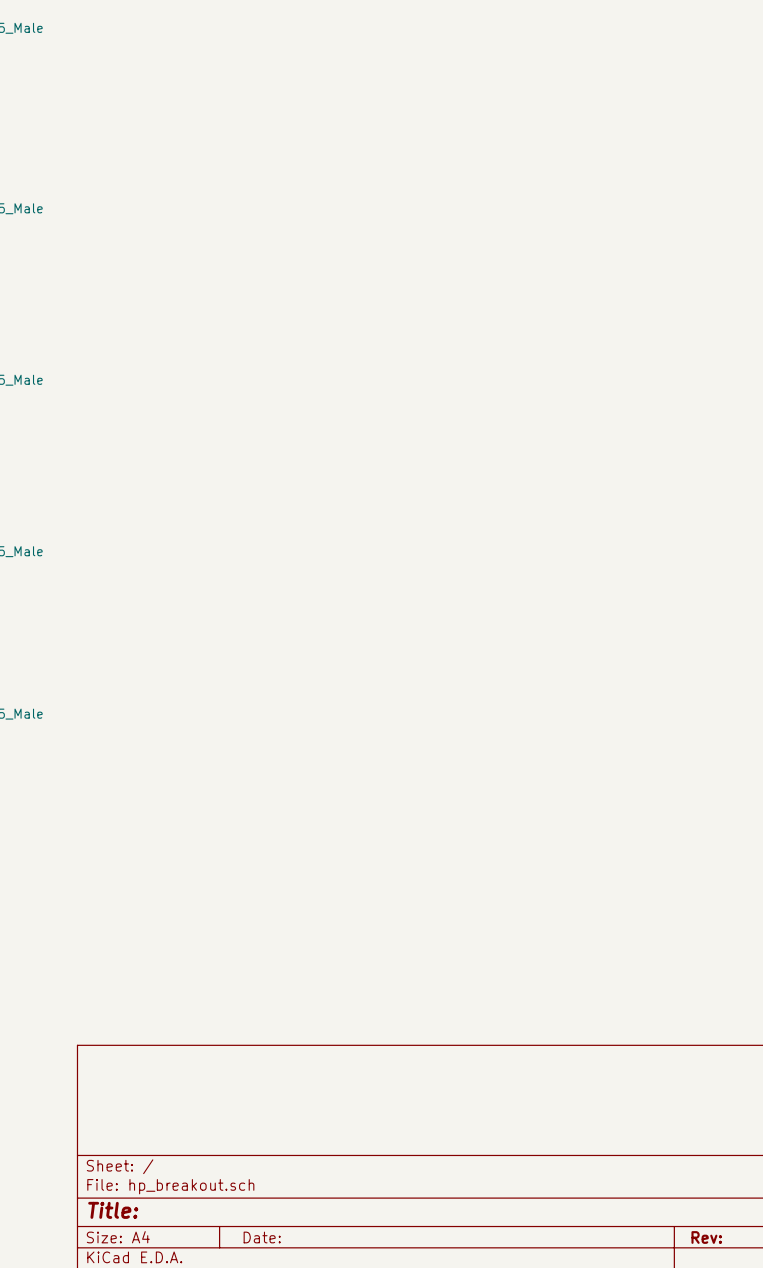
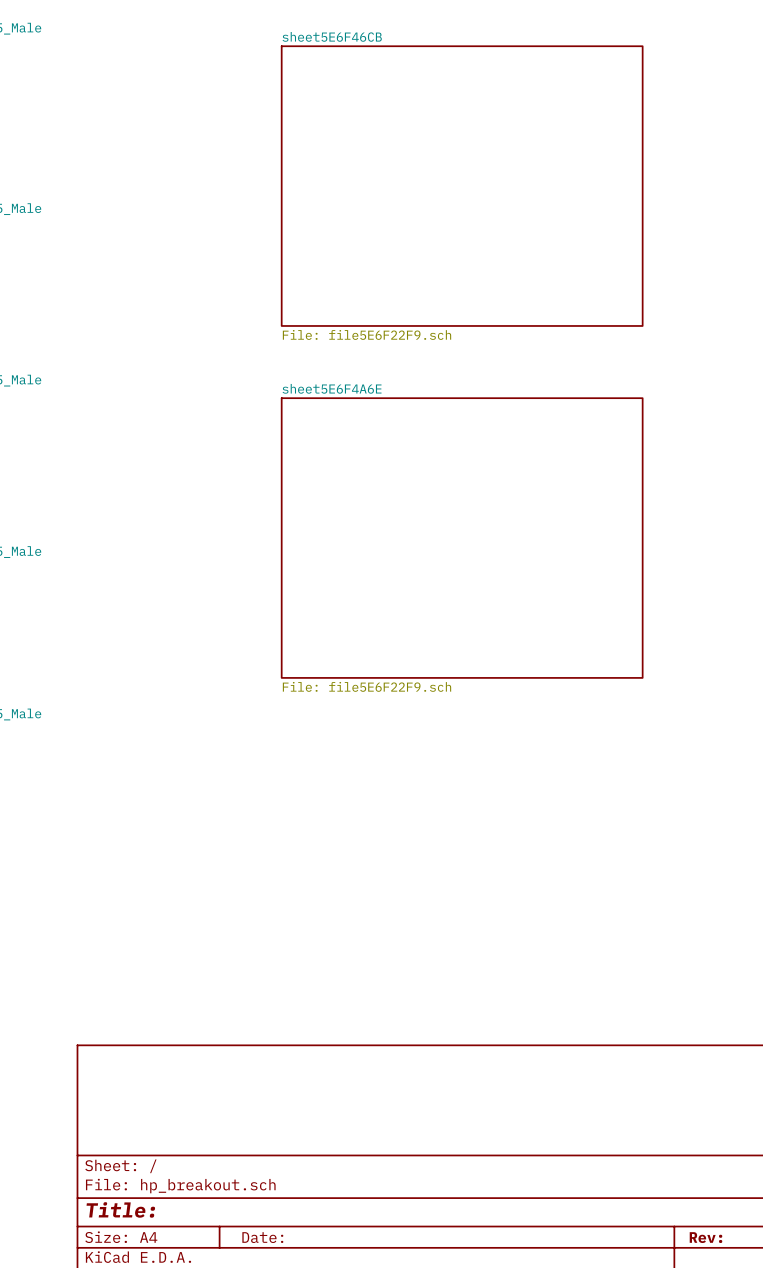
sheet sheet5E6F46CB: none -> File: file5E6F22F9.sch (462, 186)
sheet sheet5E6F4A6E: none -> File: file5E6F22F9.sch (462, 538)

